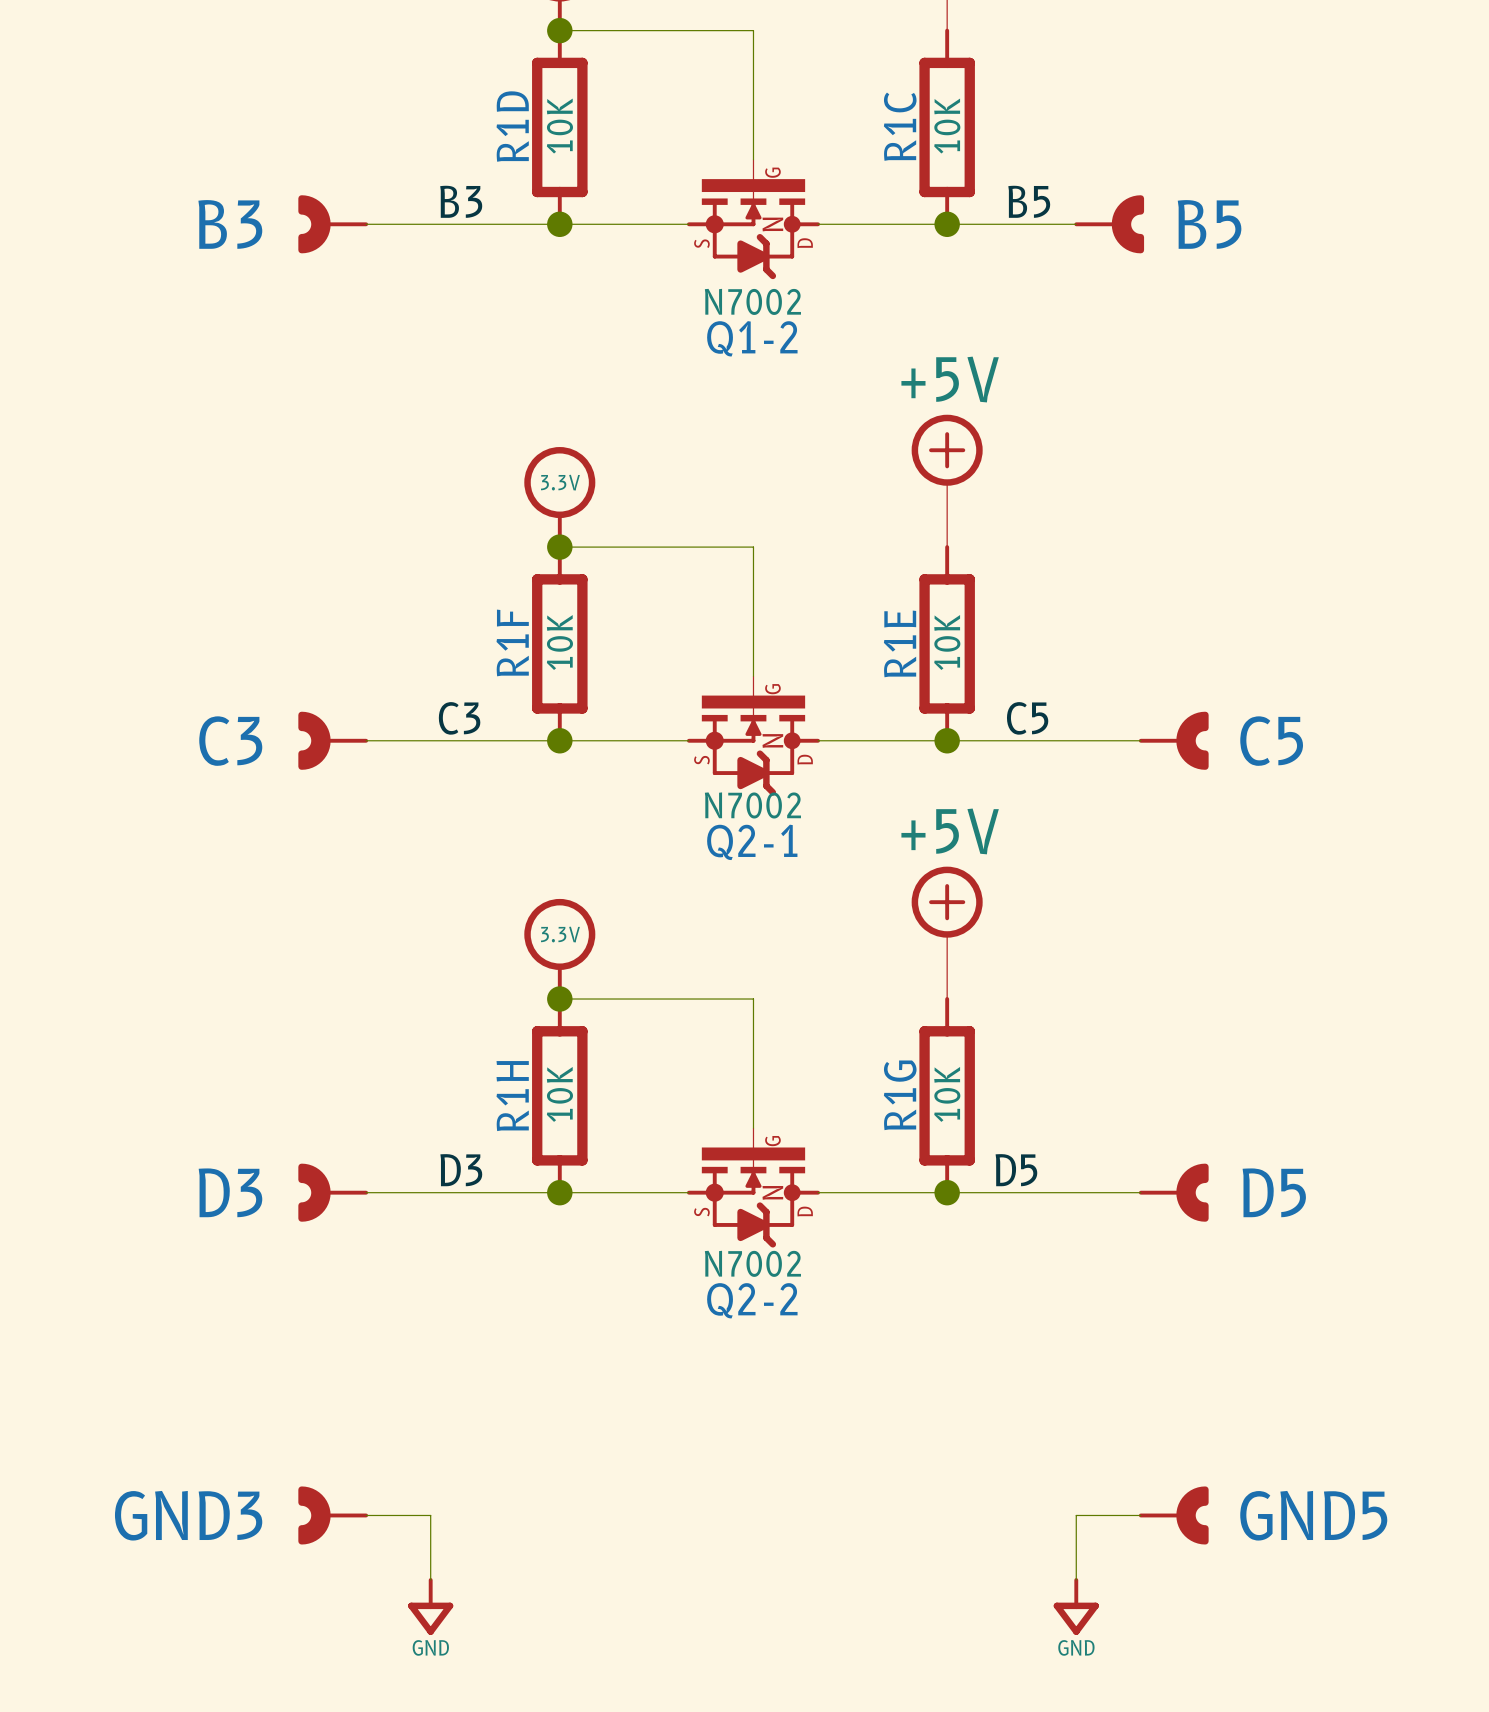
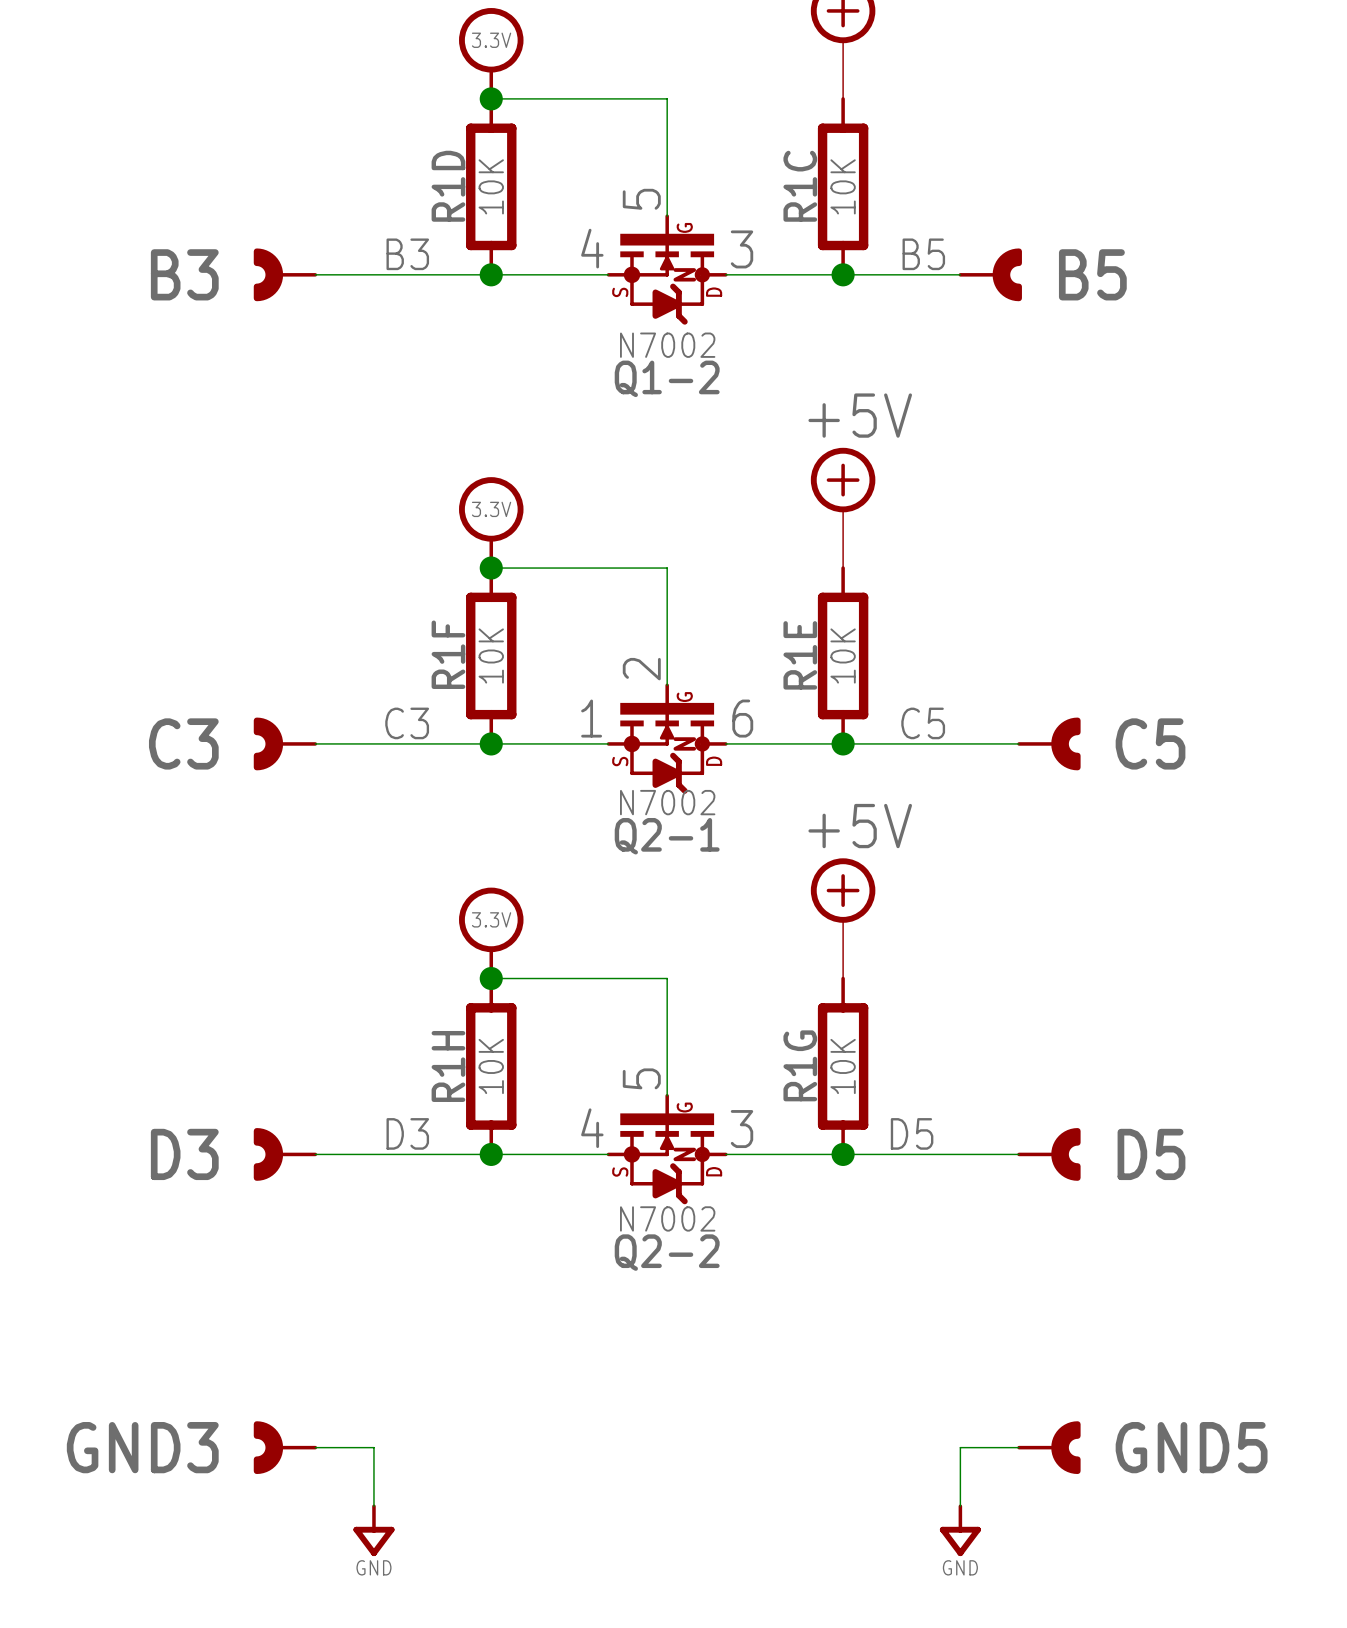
Q1-2 symbol: [686, 159, 820, 280] -> [606, 214, 728, 325]
Q2-1 symbol: [686, 676, 820, 796] -> [606, 683, 728, 794]
Q2-2 symbol: [686, 1128, 820, 1248] -> [606, 1094, 728, 1205]

